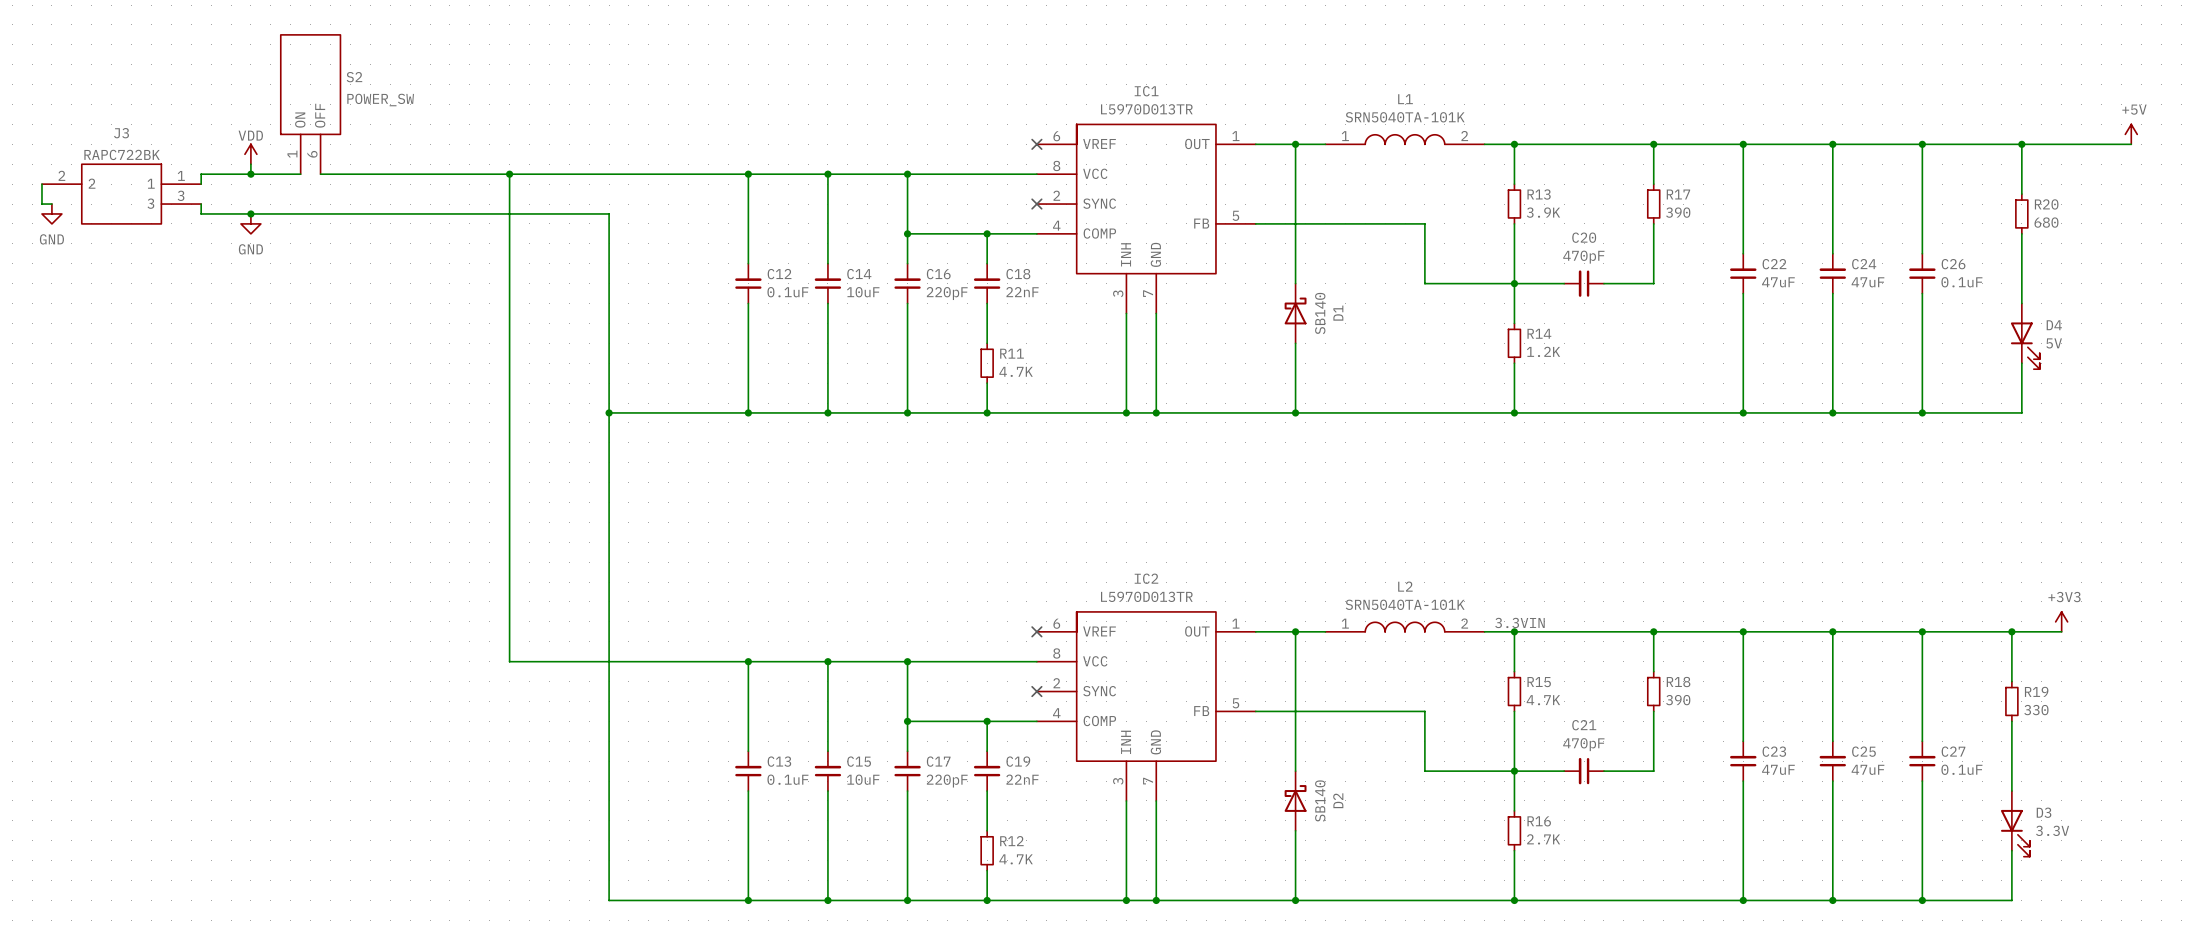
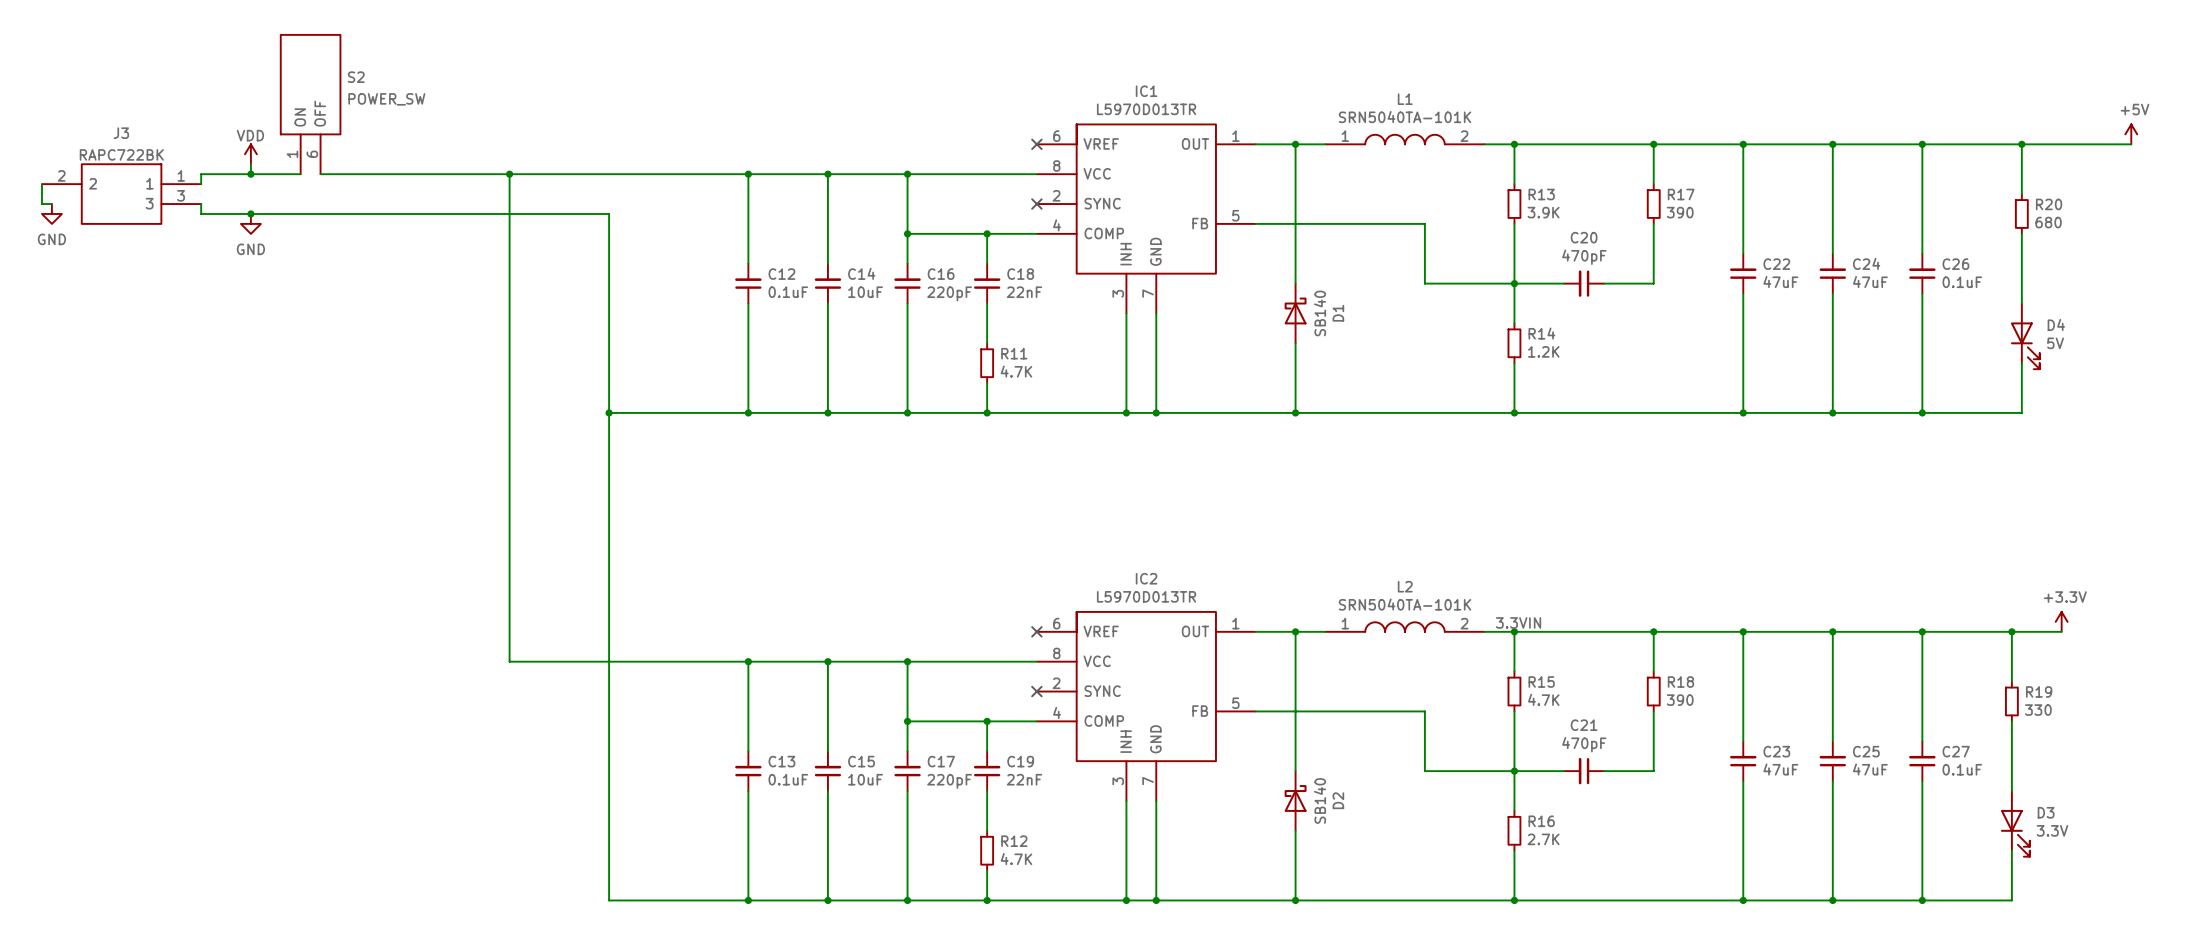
power symbol: +3V3 (2061, 621) -> +3.3V (2061, 621)

